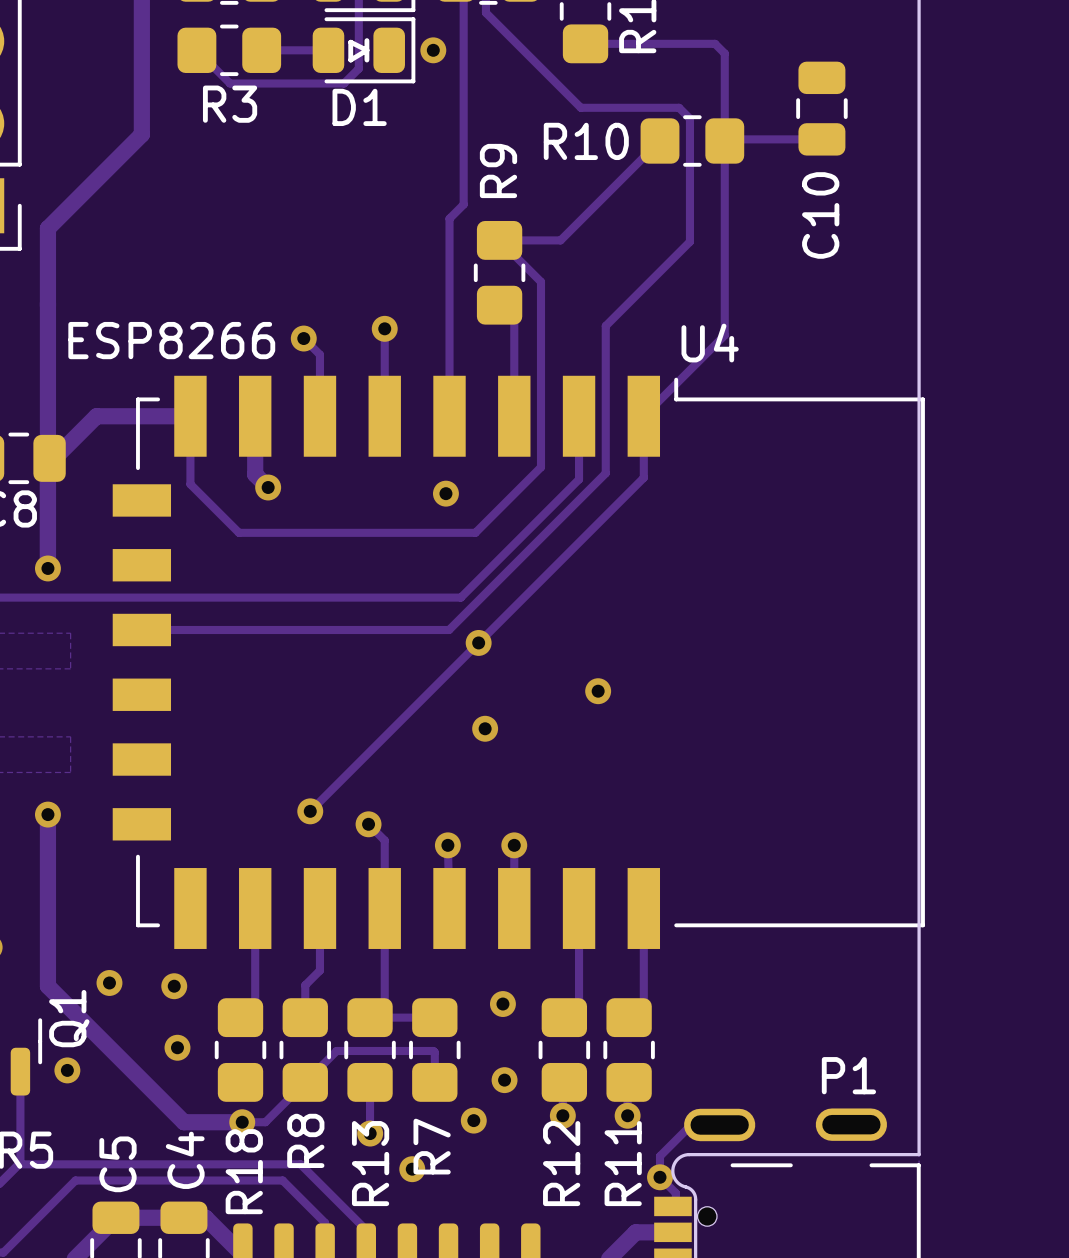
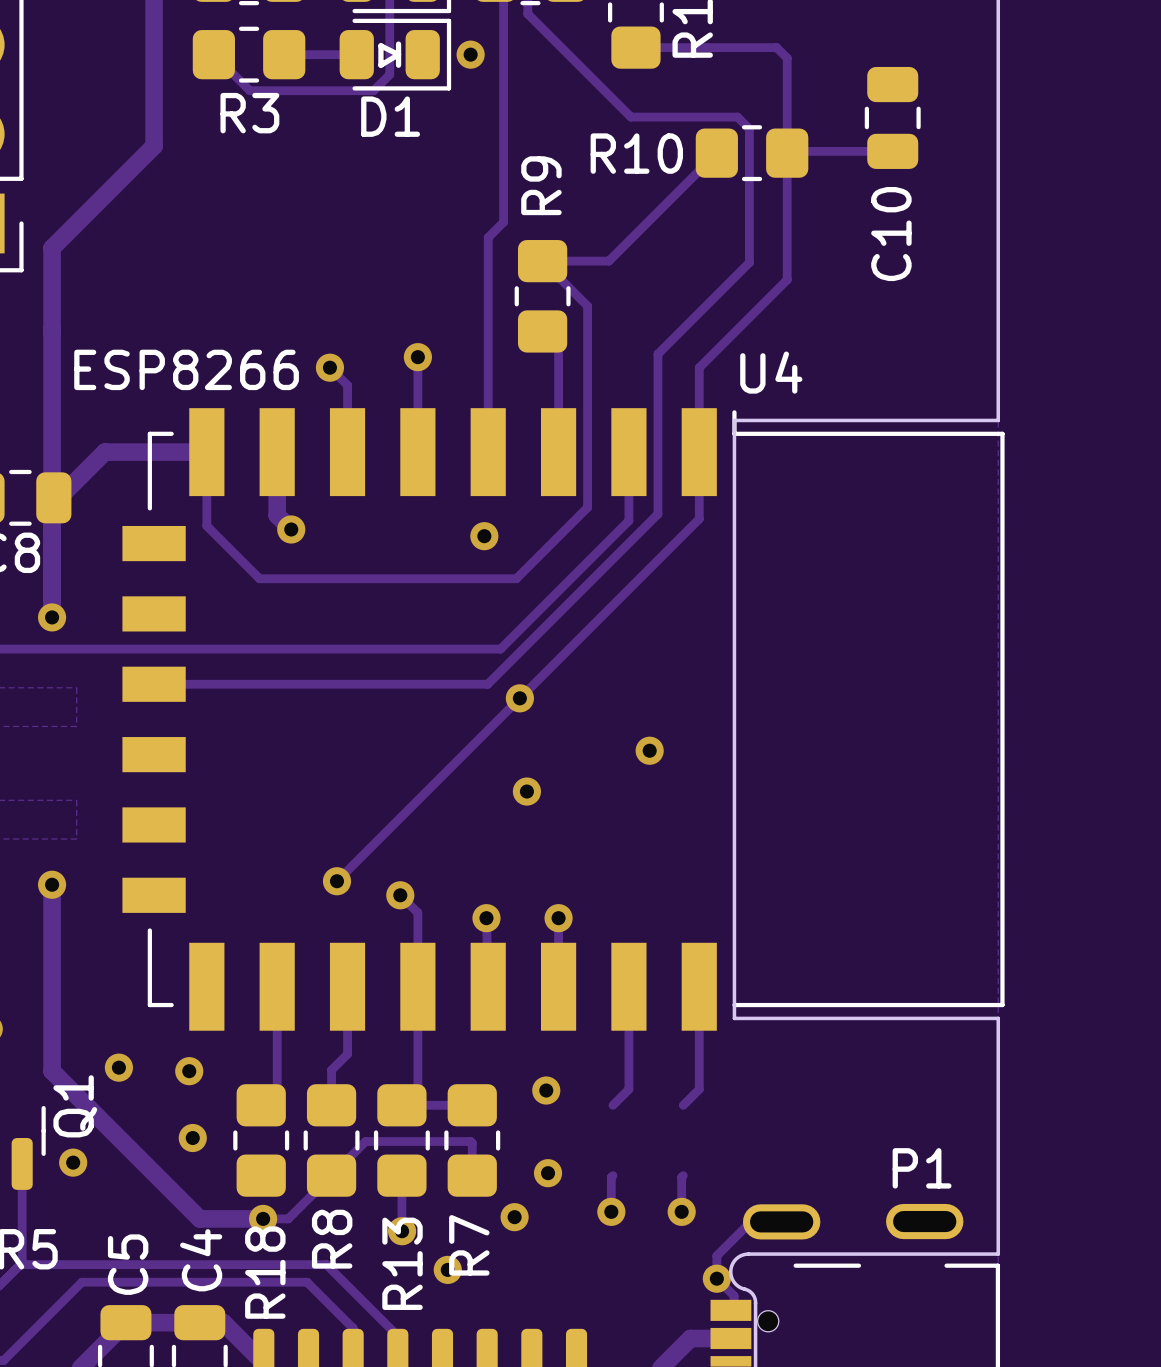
track: (724, 257) (724, 335) (643, 416) -> (787, 279) (699, 367) (699, 452)
board edge: (919, 387) (919, 937) -> (998, 420) (734, 420) (734, 1018) (998, 1018)
R12: (564, 1050) -> none
R11: (629, 1050) -> none

